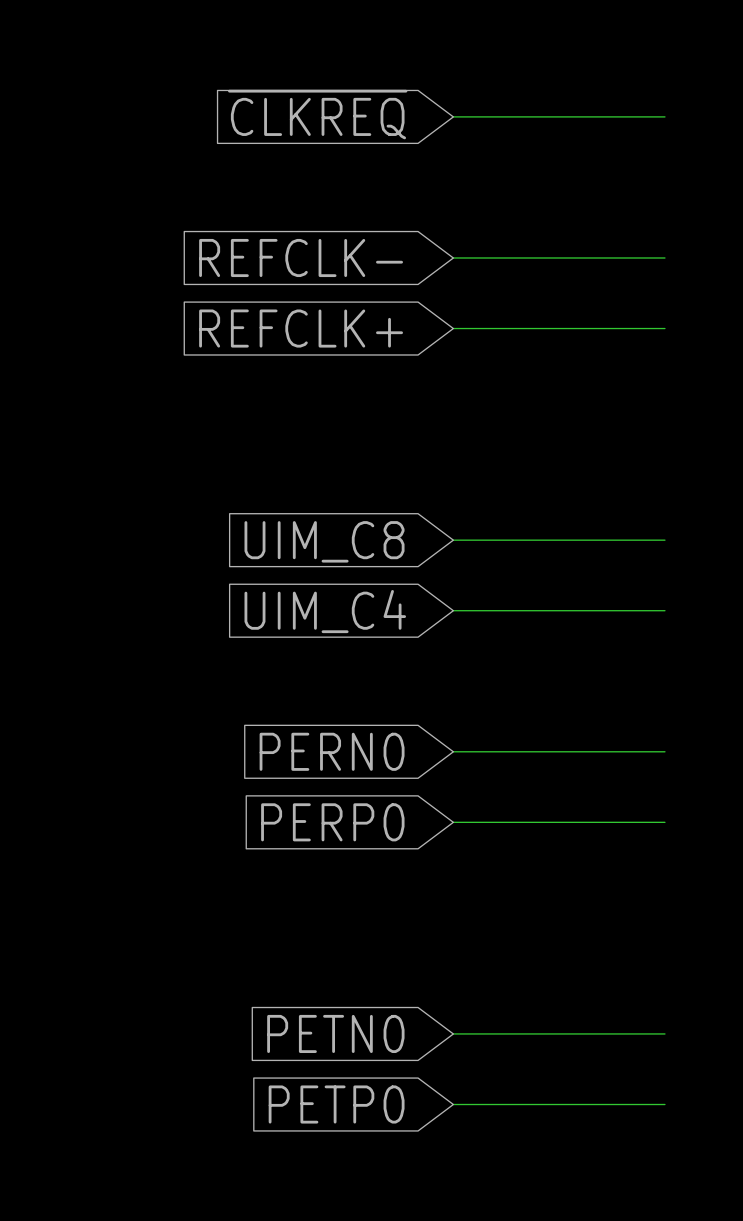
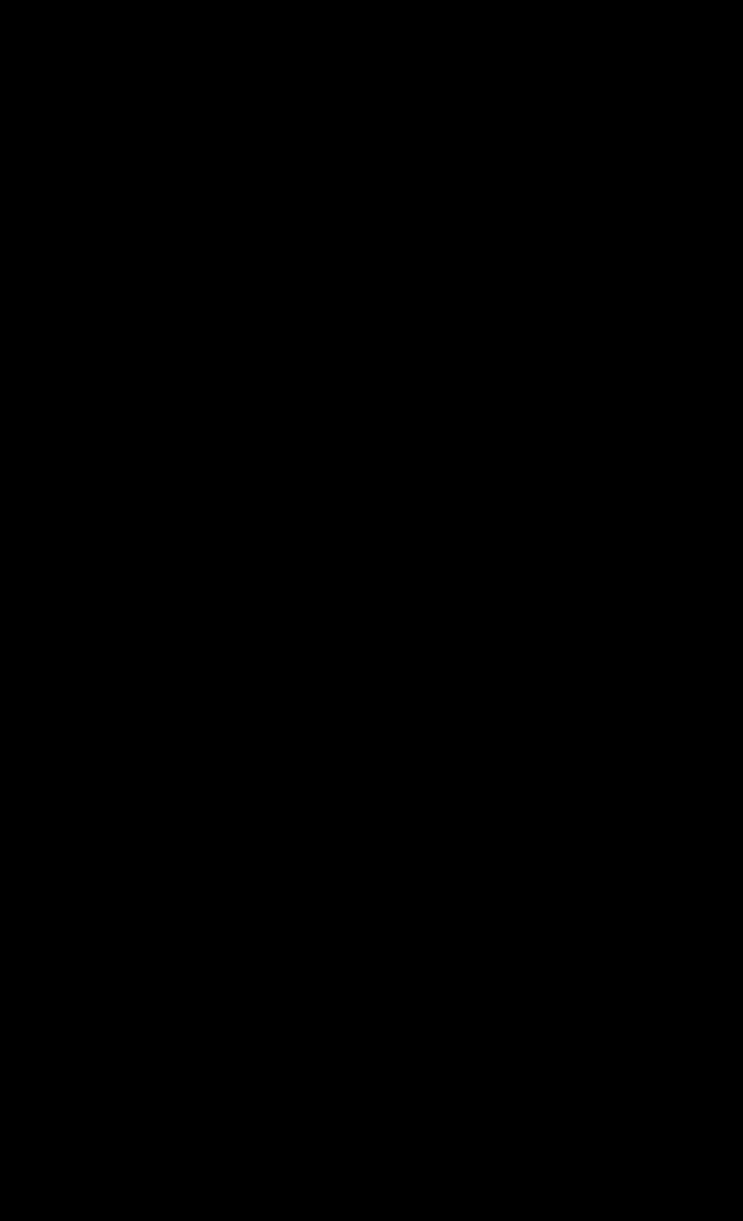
global label: ~{CLKREQ} (317, 114) -> none
wire: (453, 116) (664, 116) -> none
global label: REFCLK- (301, 257) -> none
wire: (453, 257) (664, 257) -> none
global label: REFCLK+ (301, 328) -> none
wire: (453, 328) (664, 328) -> none
wire: (453, 540) (664, 540) -> none
global label: UIM_C8 (324, 541) -> none
wire: (453, 610) (664, 610) -> none
global label: UIM_C4 (325, 611) -> none
global label: PERN0 (332, 751) -> none
wire: (453, 751) (664, 751) -> none
global label: PERP0 (332, 822) -> none
wire: (453, 822) (664, 822) -> none
global label: PETN0 (335, 1033) -> none
wire: (453, 1033) (664, 1033) -> none
global label: PETP0 (336, 1104) -> none
wire: (453, 1104) (664, 1104) -> none

